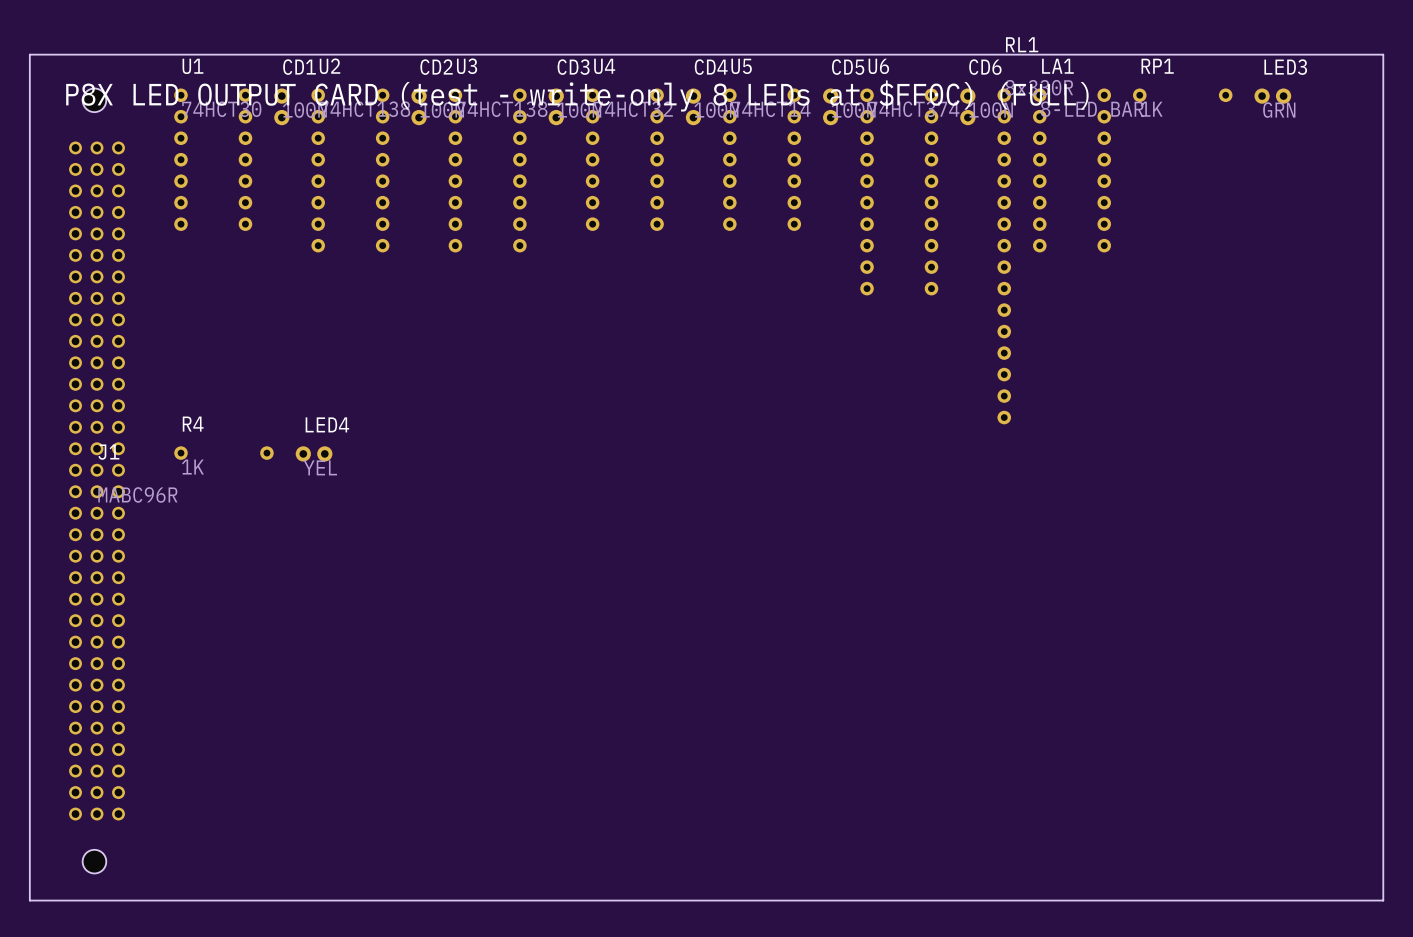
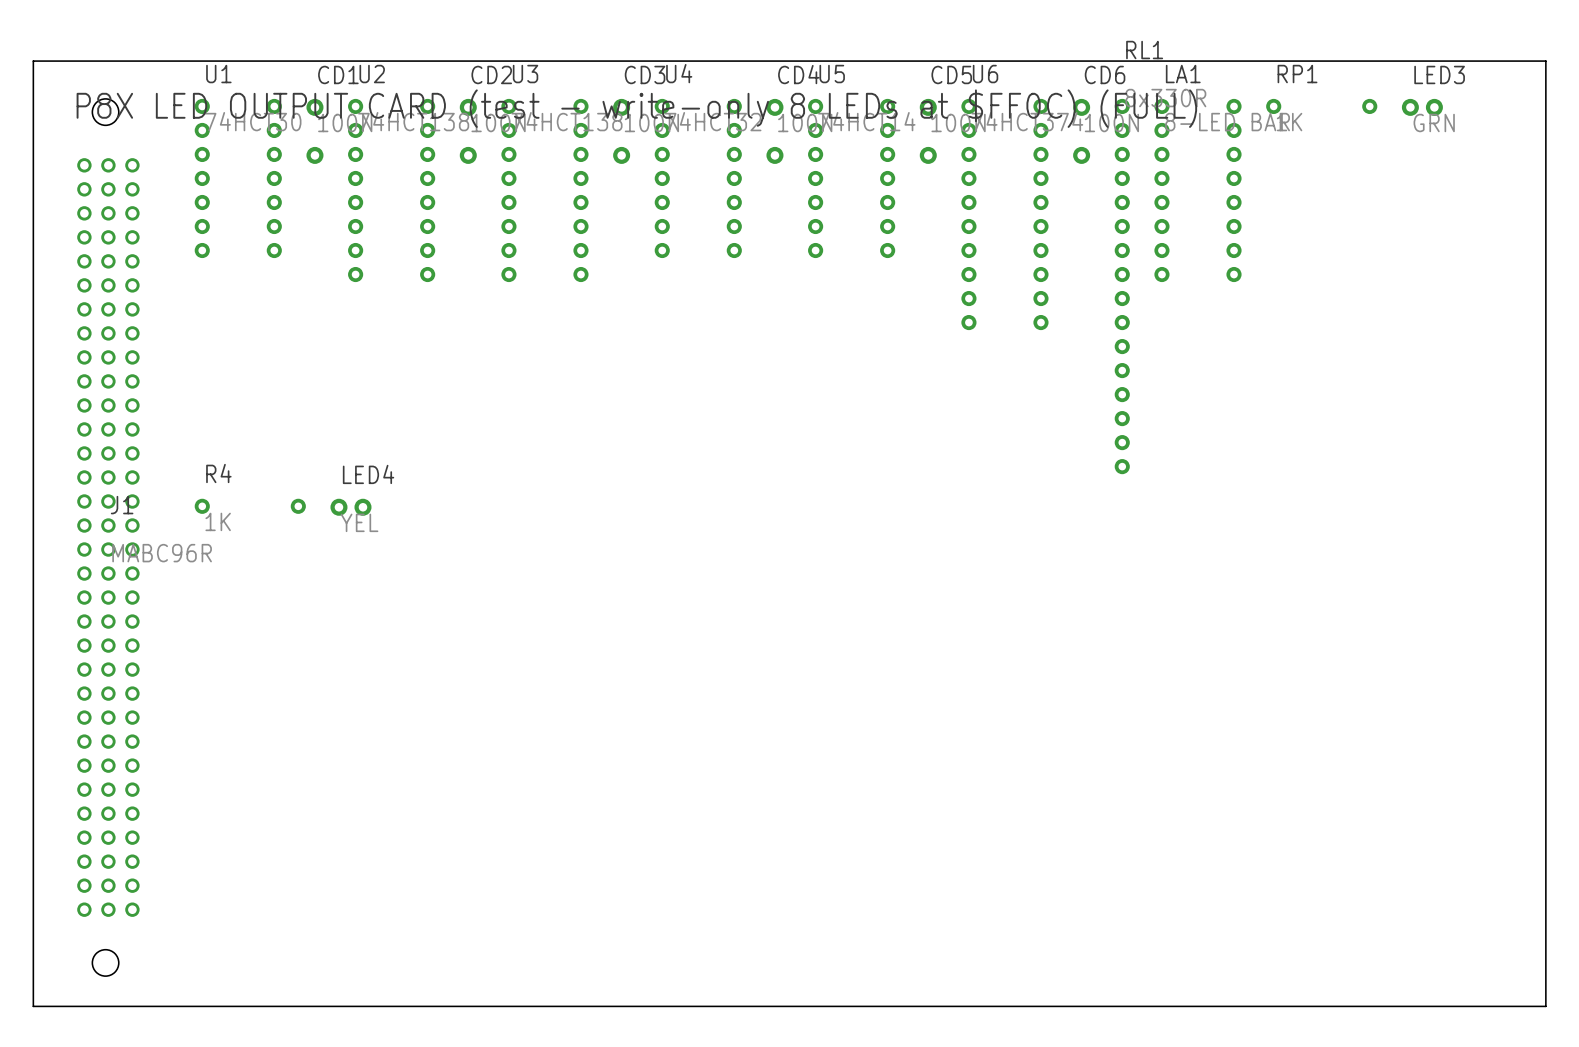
CD1 footprint: [274, 88, 290, 126] -> [306, 98, 324, 164]
CD2 footprint: [411, 88, 427, 126] -> [459, 98, 477, 164]
CD3 footprint: [548, 88, 564, 126] -> [613, 98, 631, 164]
CD4 footprint: [685, 88, 702, 126] -> [766, 98, 784, 164]
CD5 footprint: [823, 88, 839, 126] -> [919, 98, 937, 164]
CD6 footprint: [960, 88, 976, 126] -> [1073, 98, 1091, 164]

